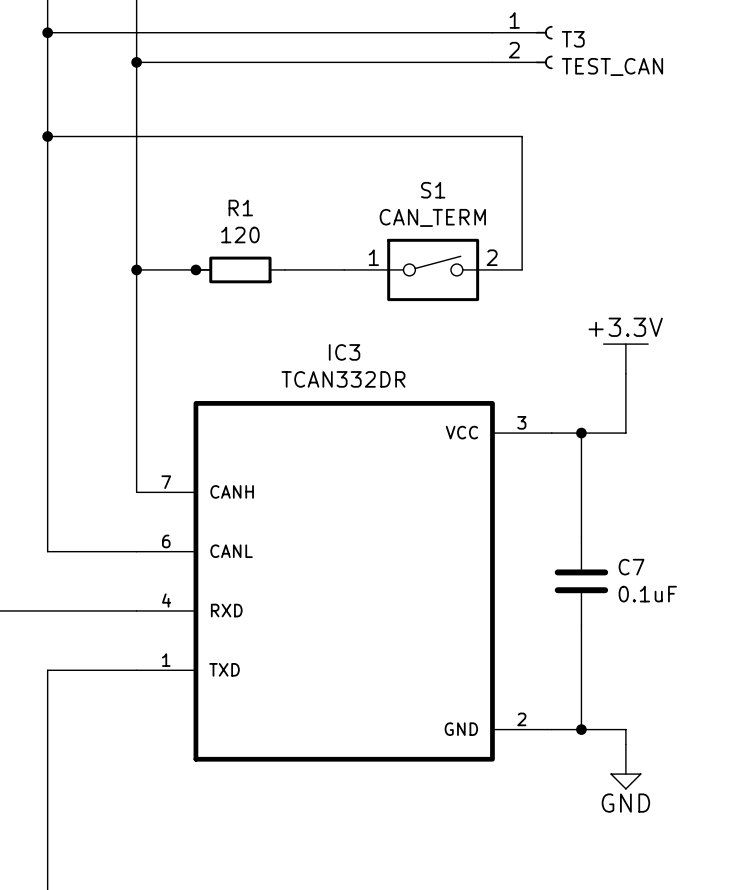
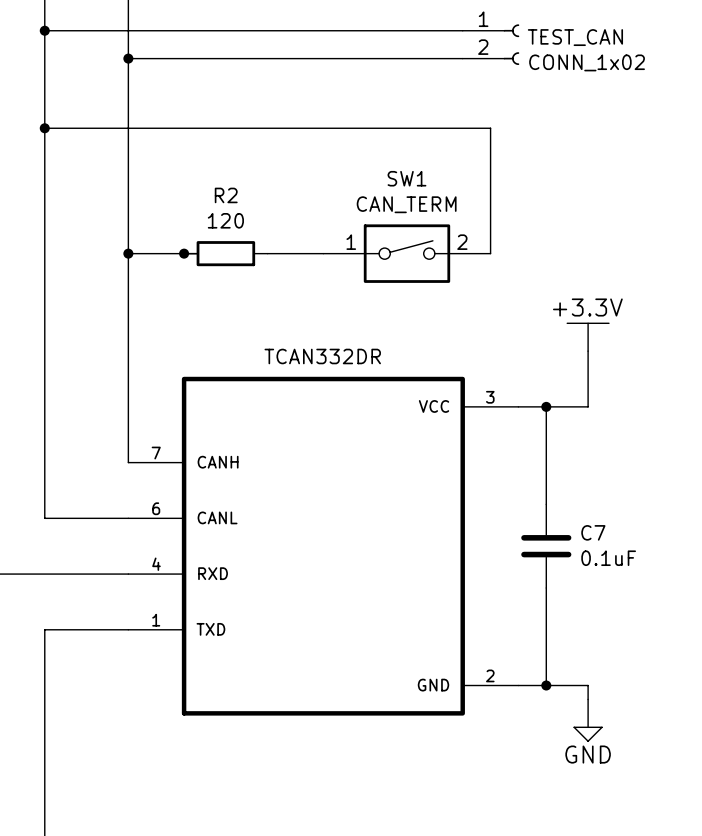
T3 name: T3 (573, 39) -> TEST_CAN (575, 37)
T3 value: TEST_CAN (612, 66) -> CONN_1x02 (587, 62)
S1 name: S1 (433, 190) -> SW1 (406, 178)
R1 name: R1 (240, 208) -> R2 (226, 195)
IC3 name: IC3 (344, 352) -> none

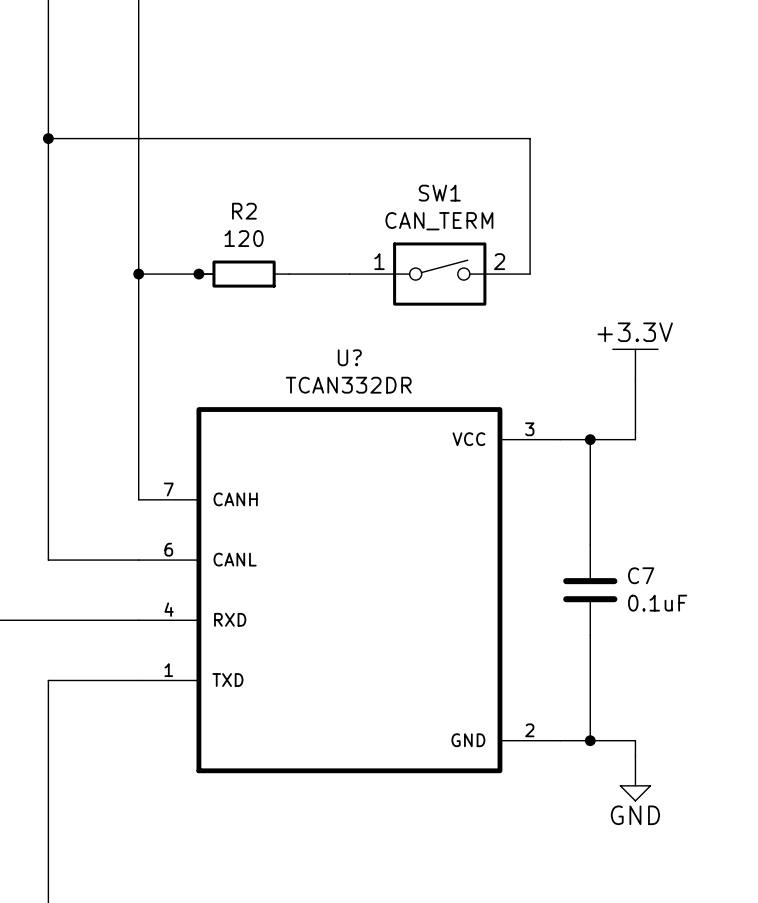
wire: (44, 30) (462, 30) -> none
junction: (44, 30) -> none
TEST_CAN: CONN_1x02 (490, 44) -> none
wire: (128, 58) (462, 58) -> none
junction: (128, 58) -> none
U? name: none -> U? (349, 357)

